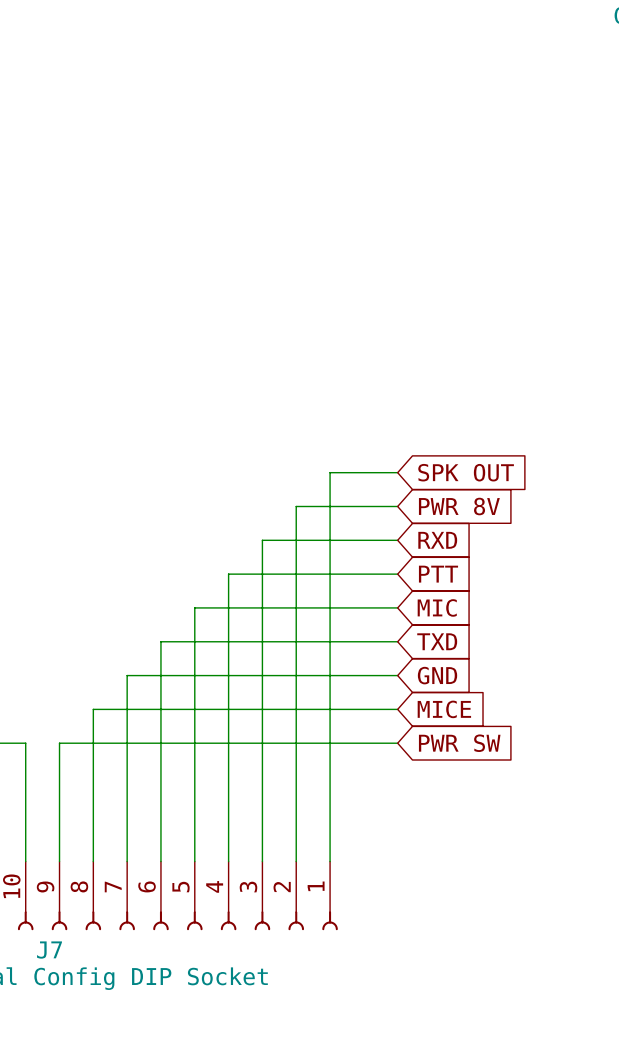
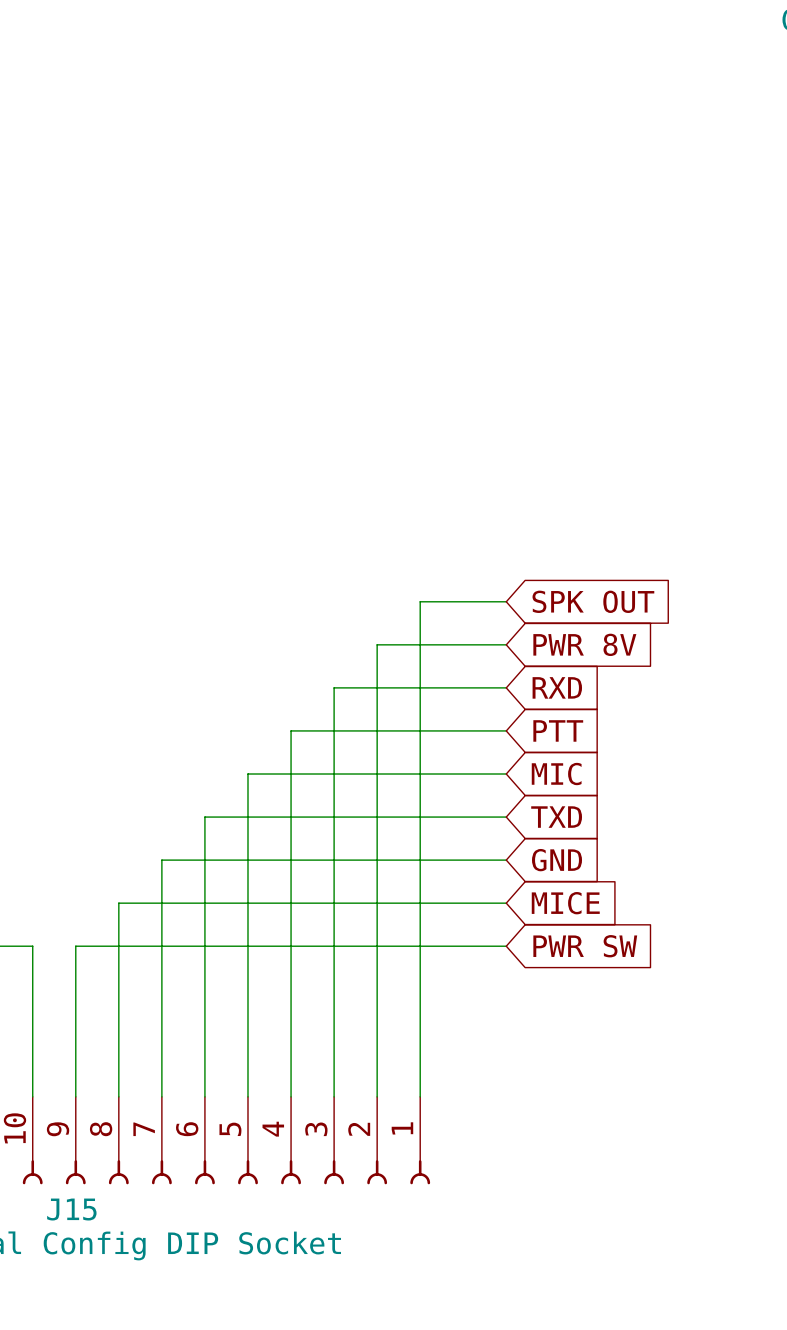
J7 name: J7 (49, 950) -> J15 (71, 1209)

